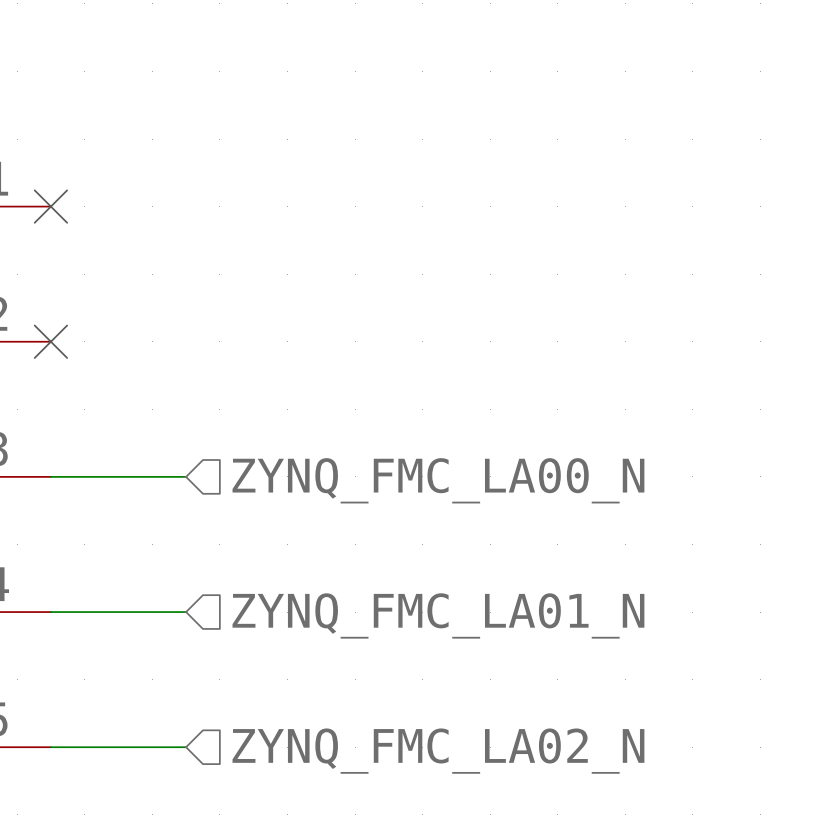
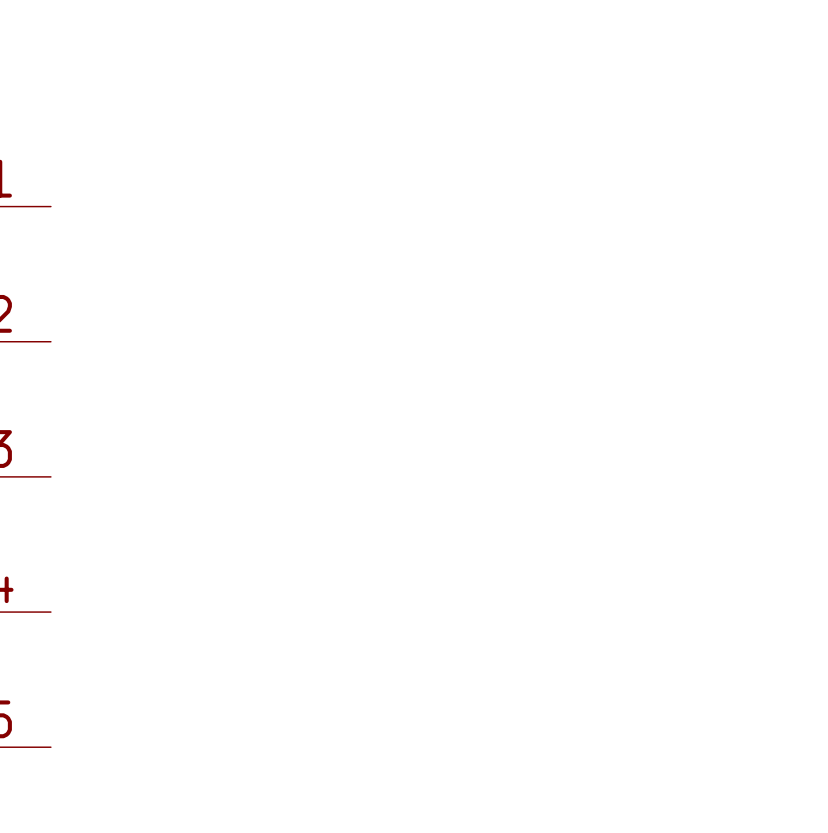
no-connect mark: (50, 206) -> none
no-connect mark: (50, 341) -> none
wire: (50, 476) (186, 476) -> none
hierarchical label: ZYNQ_FMC_LA00_N (438, 480) -> none
wire: (50, 612) (186, 612) -> none
hierarchical label: ZYNQ_FMC_LA01_N (438, 615) -> none
wire: (50, 747) (186, 747) -> none
hierarchical label: ZYNQ_FMC_LA02_N (438, 751) -> none

